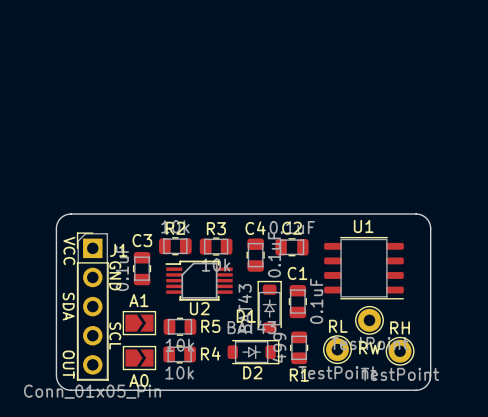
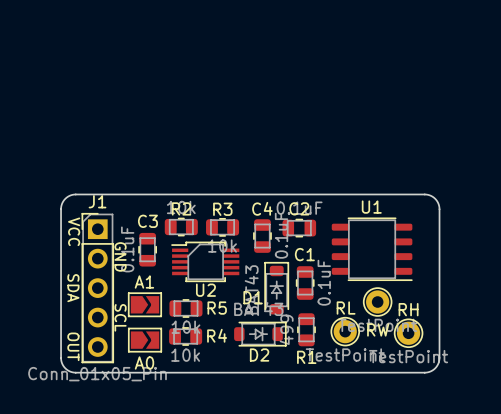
J1 name position: J1 (118, 250) -> J1 (97, 201)

